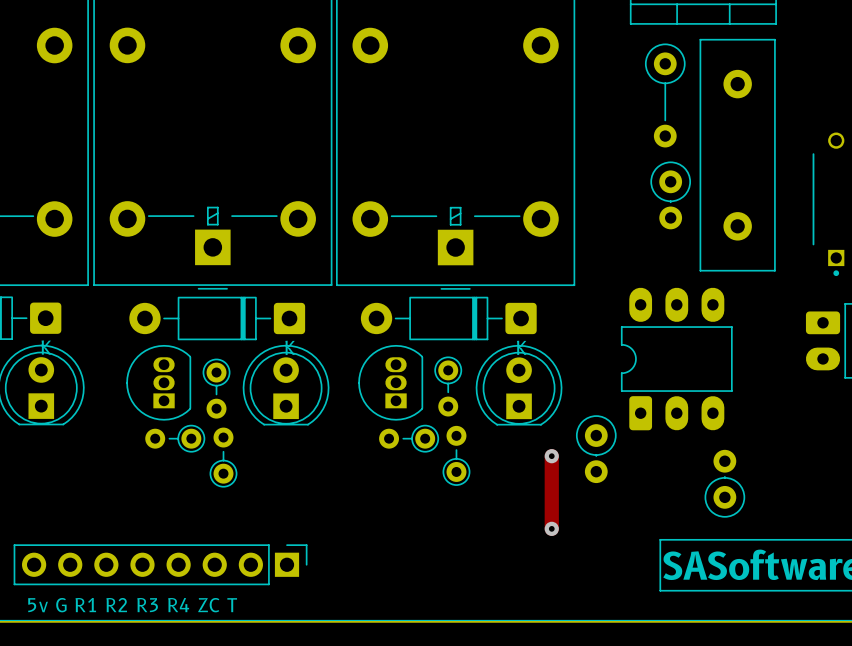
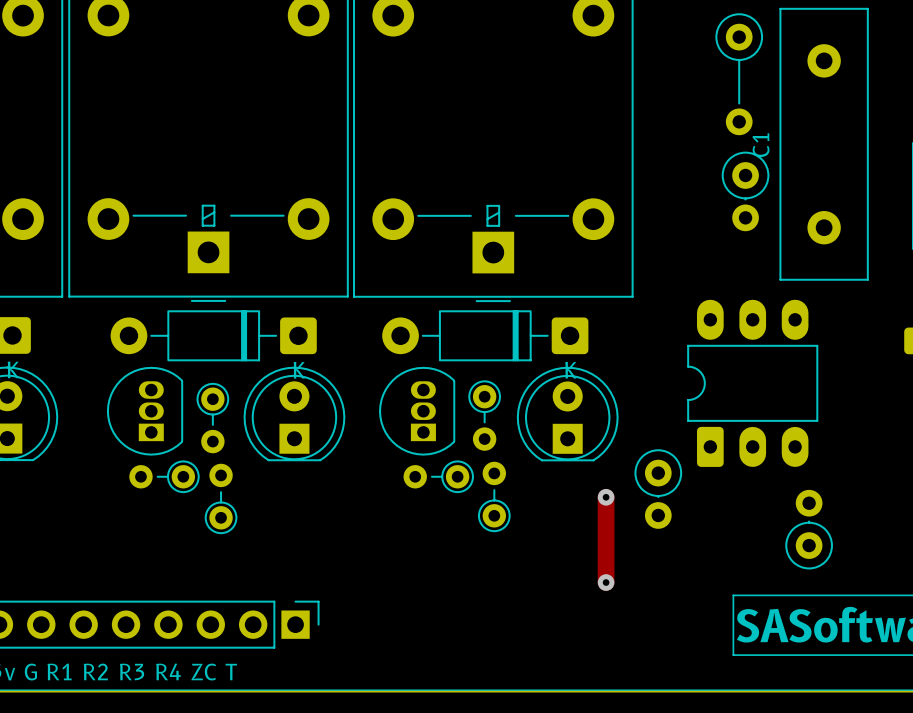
C1 name: none -> C1 (761, 145)

